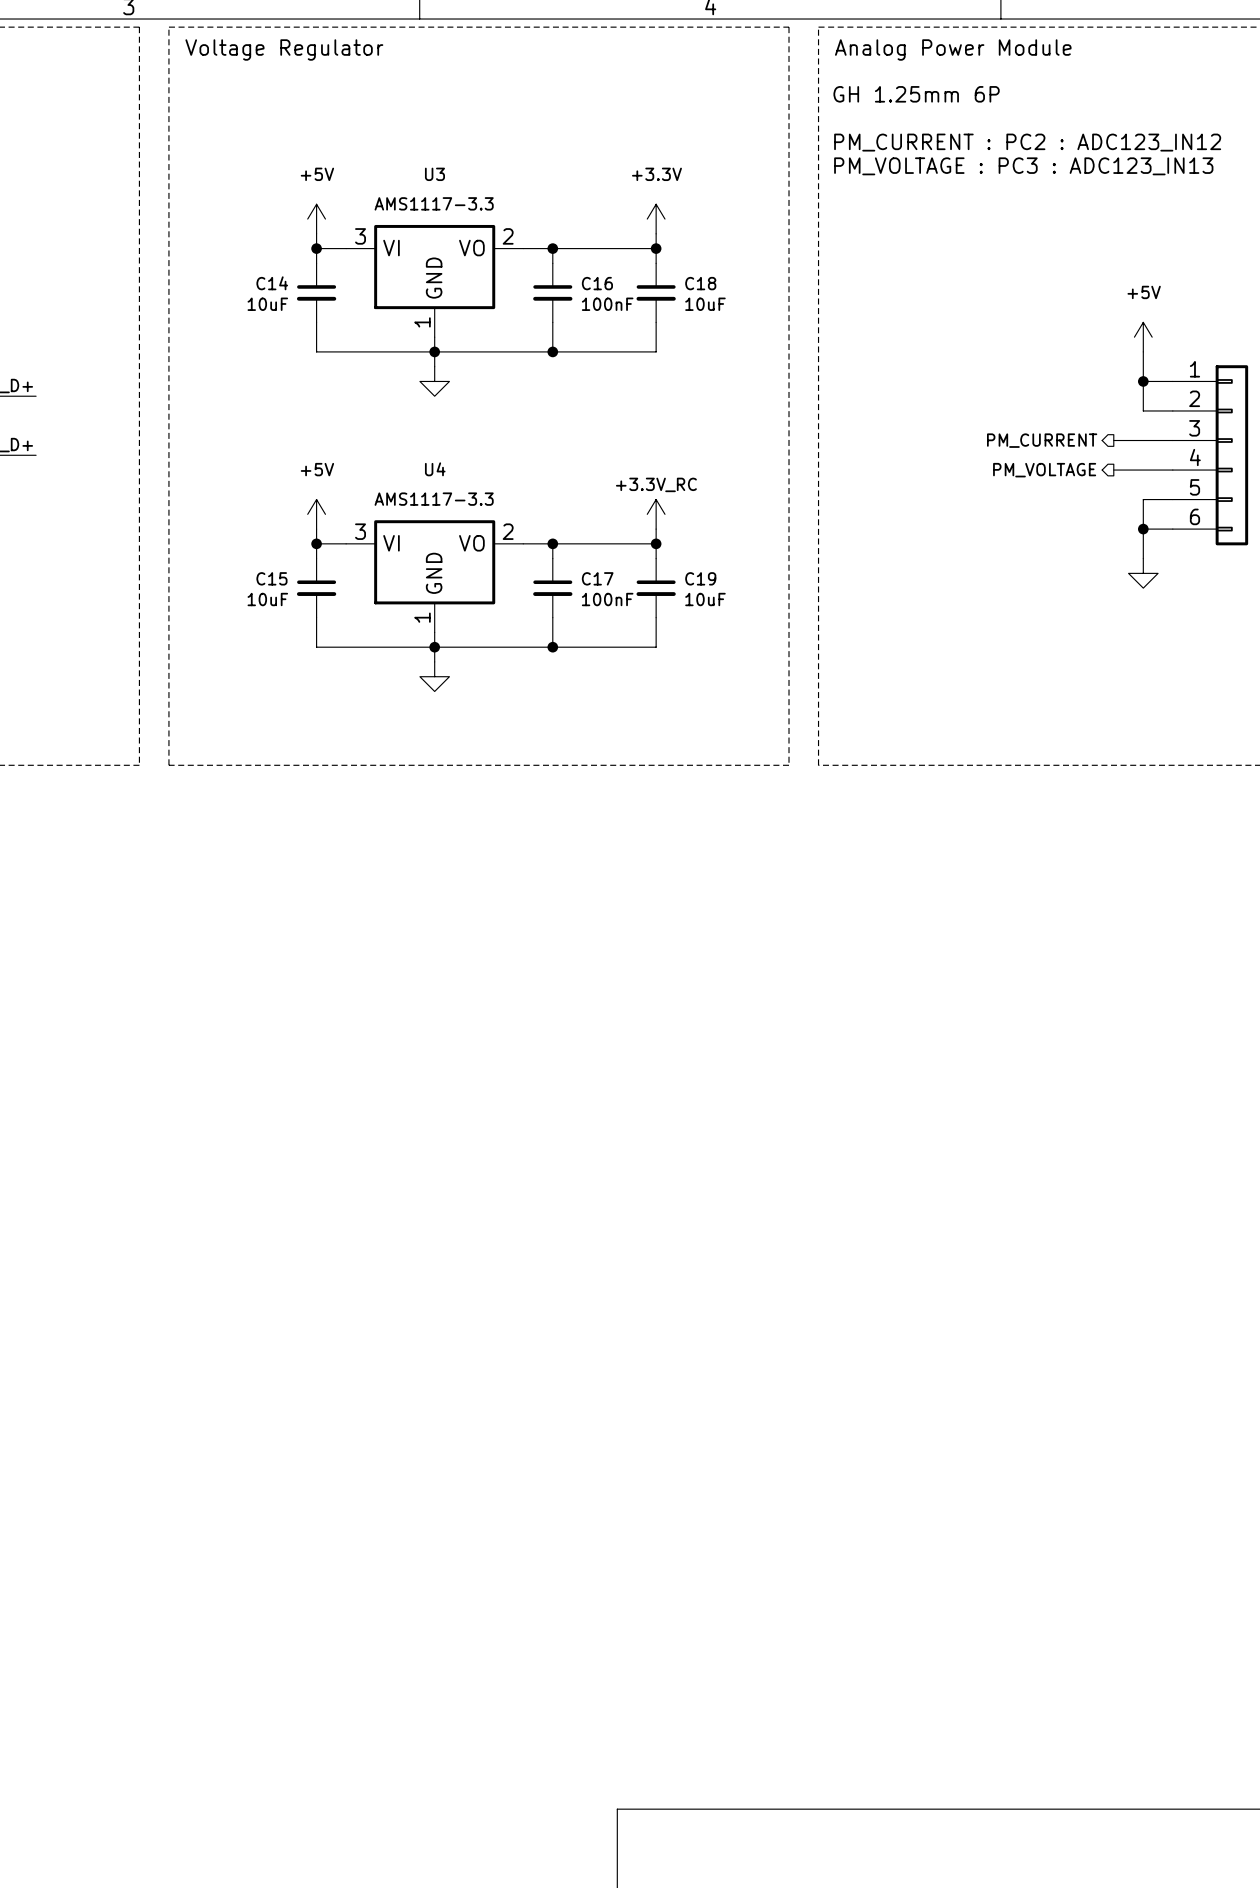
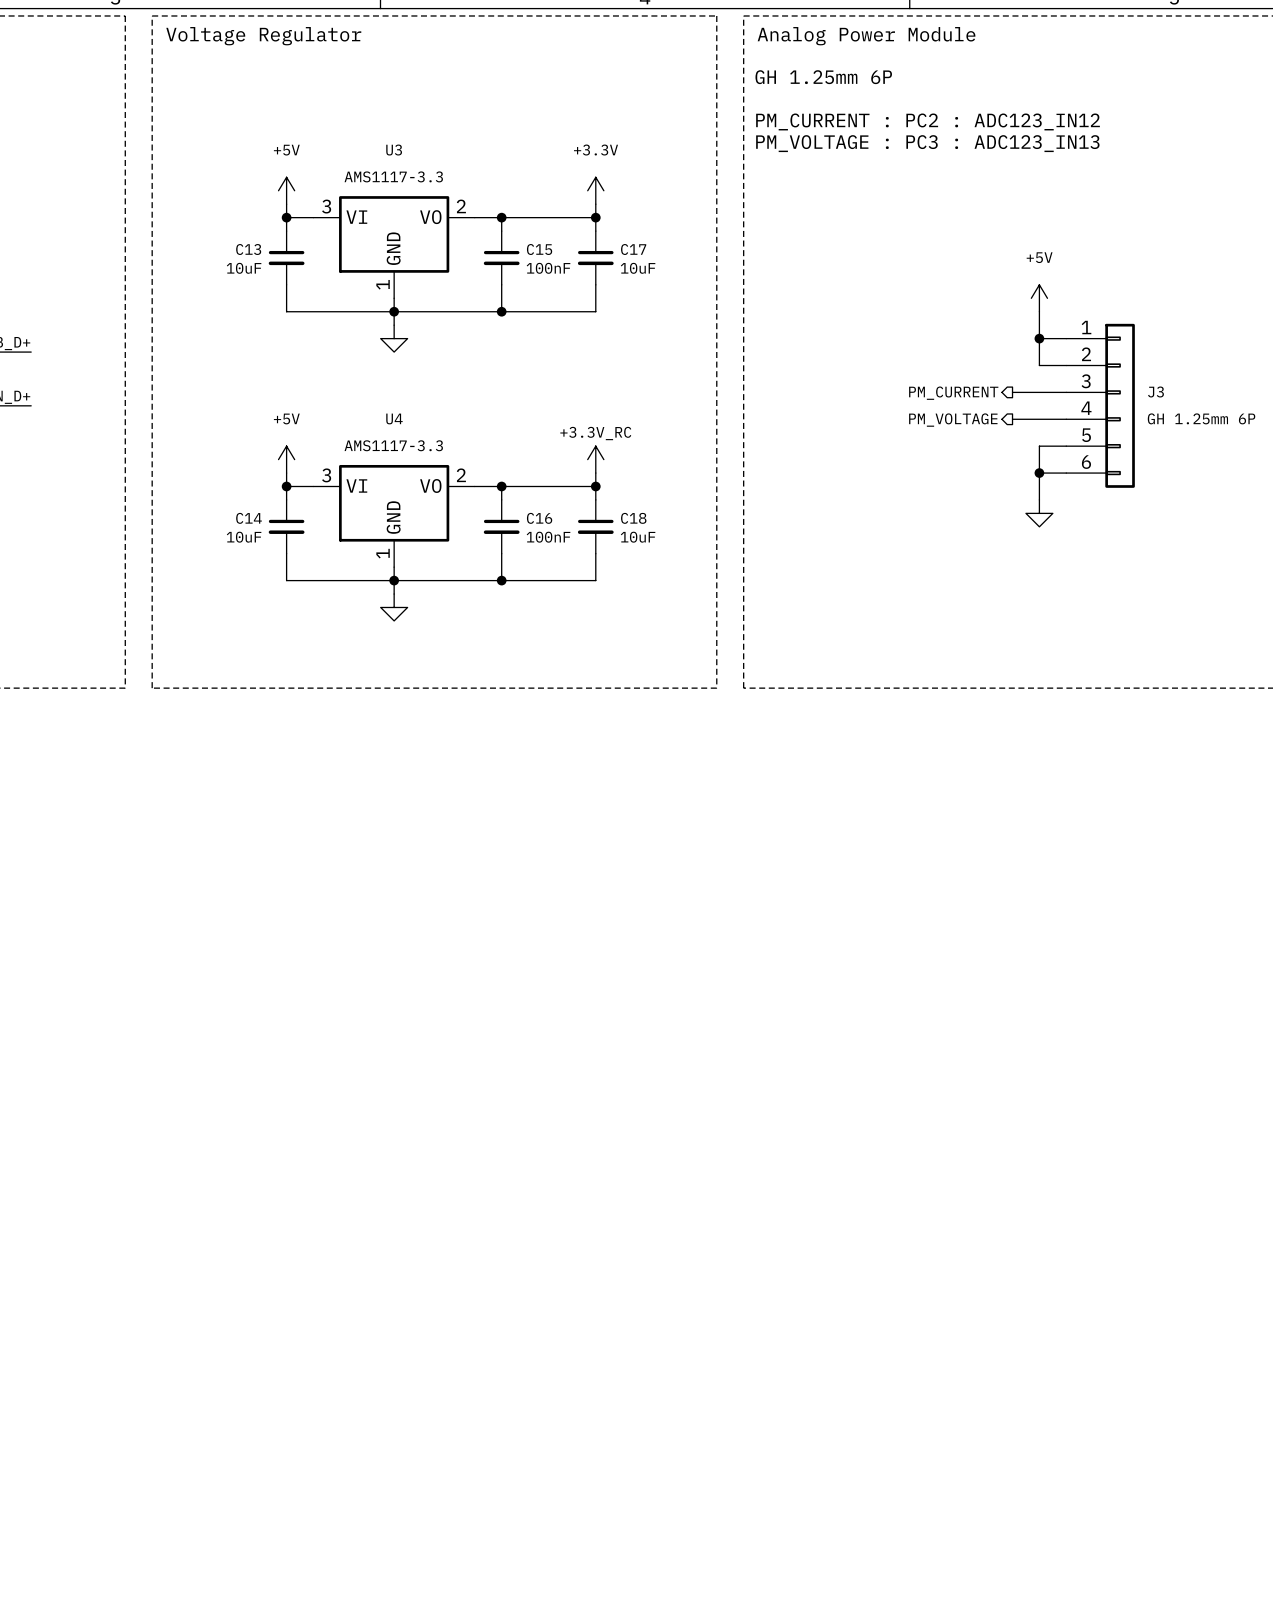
C14 name: C14 (272, 283) -> C13 (248, 249)
C16 name: C16 (597, 283) -> C15 (539, 249)
C18 name: C18 (700, 283) -> C17 (633, 249)
C15 name: C15 (271, 578) -> C14 (249, 518)
C17 name: C17 (597, 578) -> C16 (539, 518)
C19 name: C19 (700, 578) -> C18 (633, 518)

